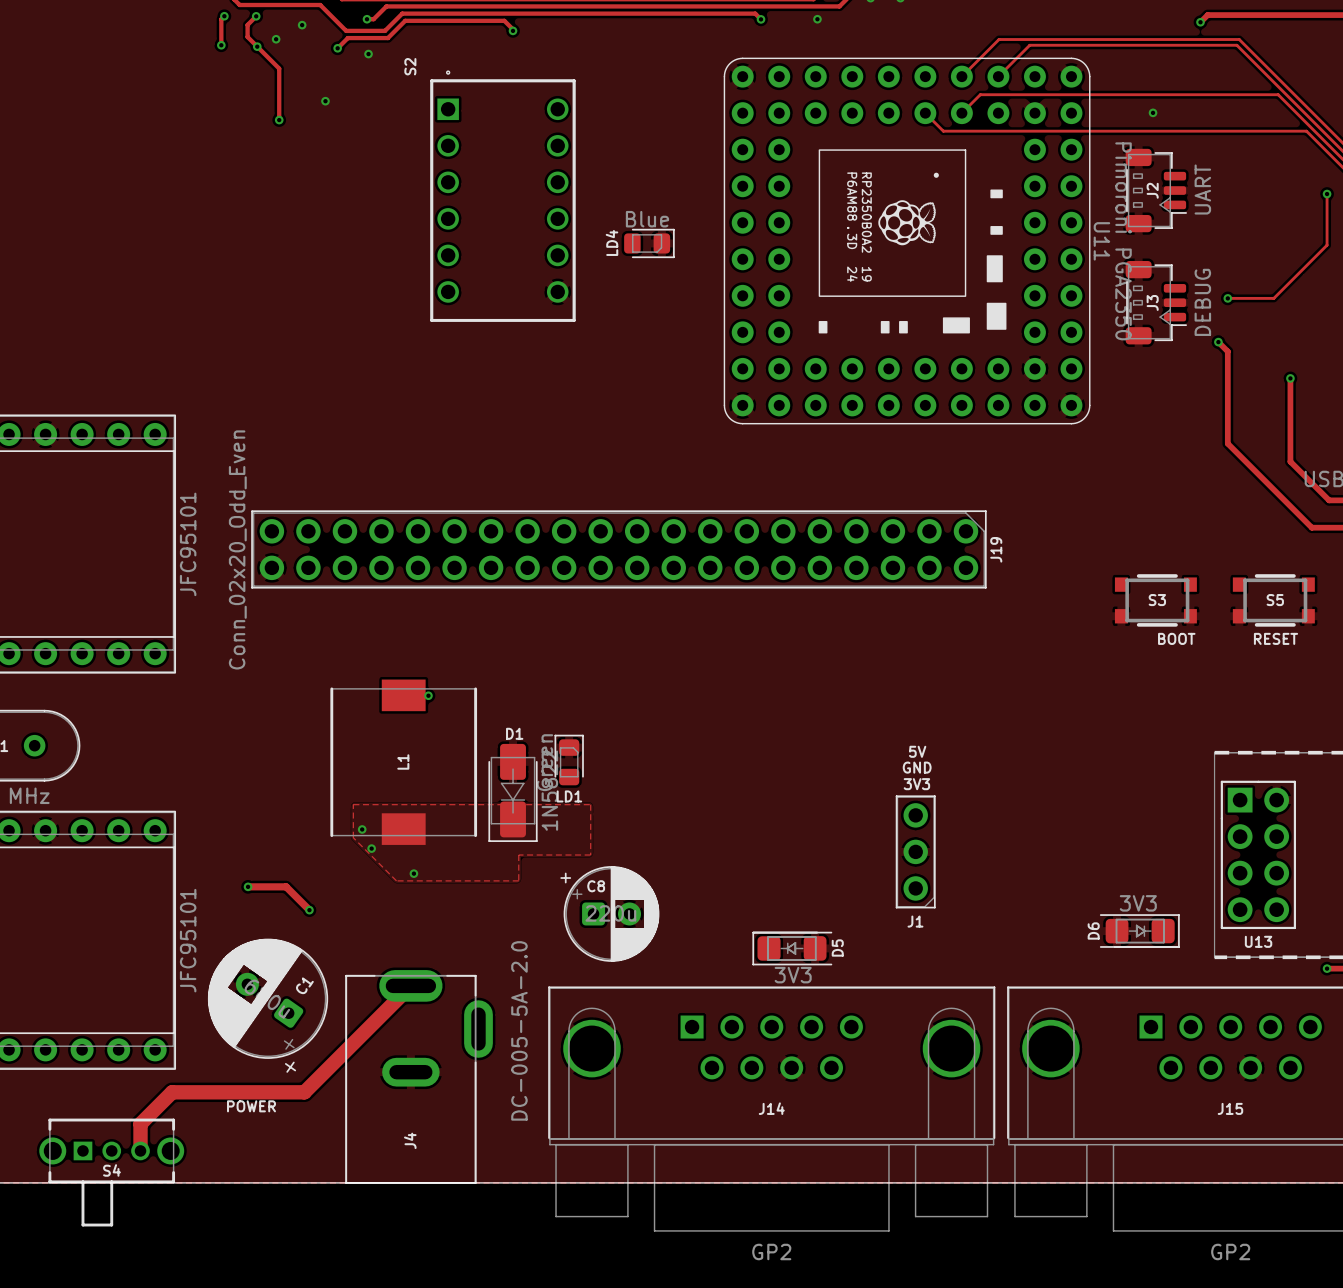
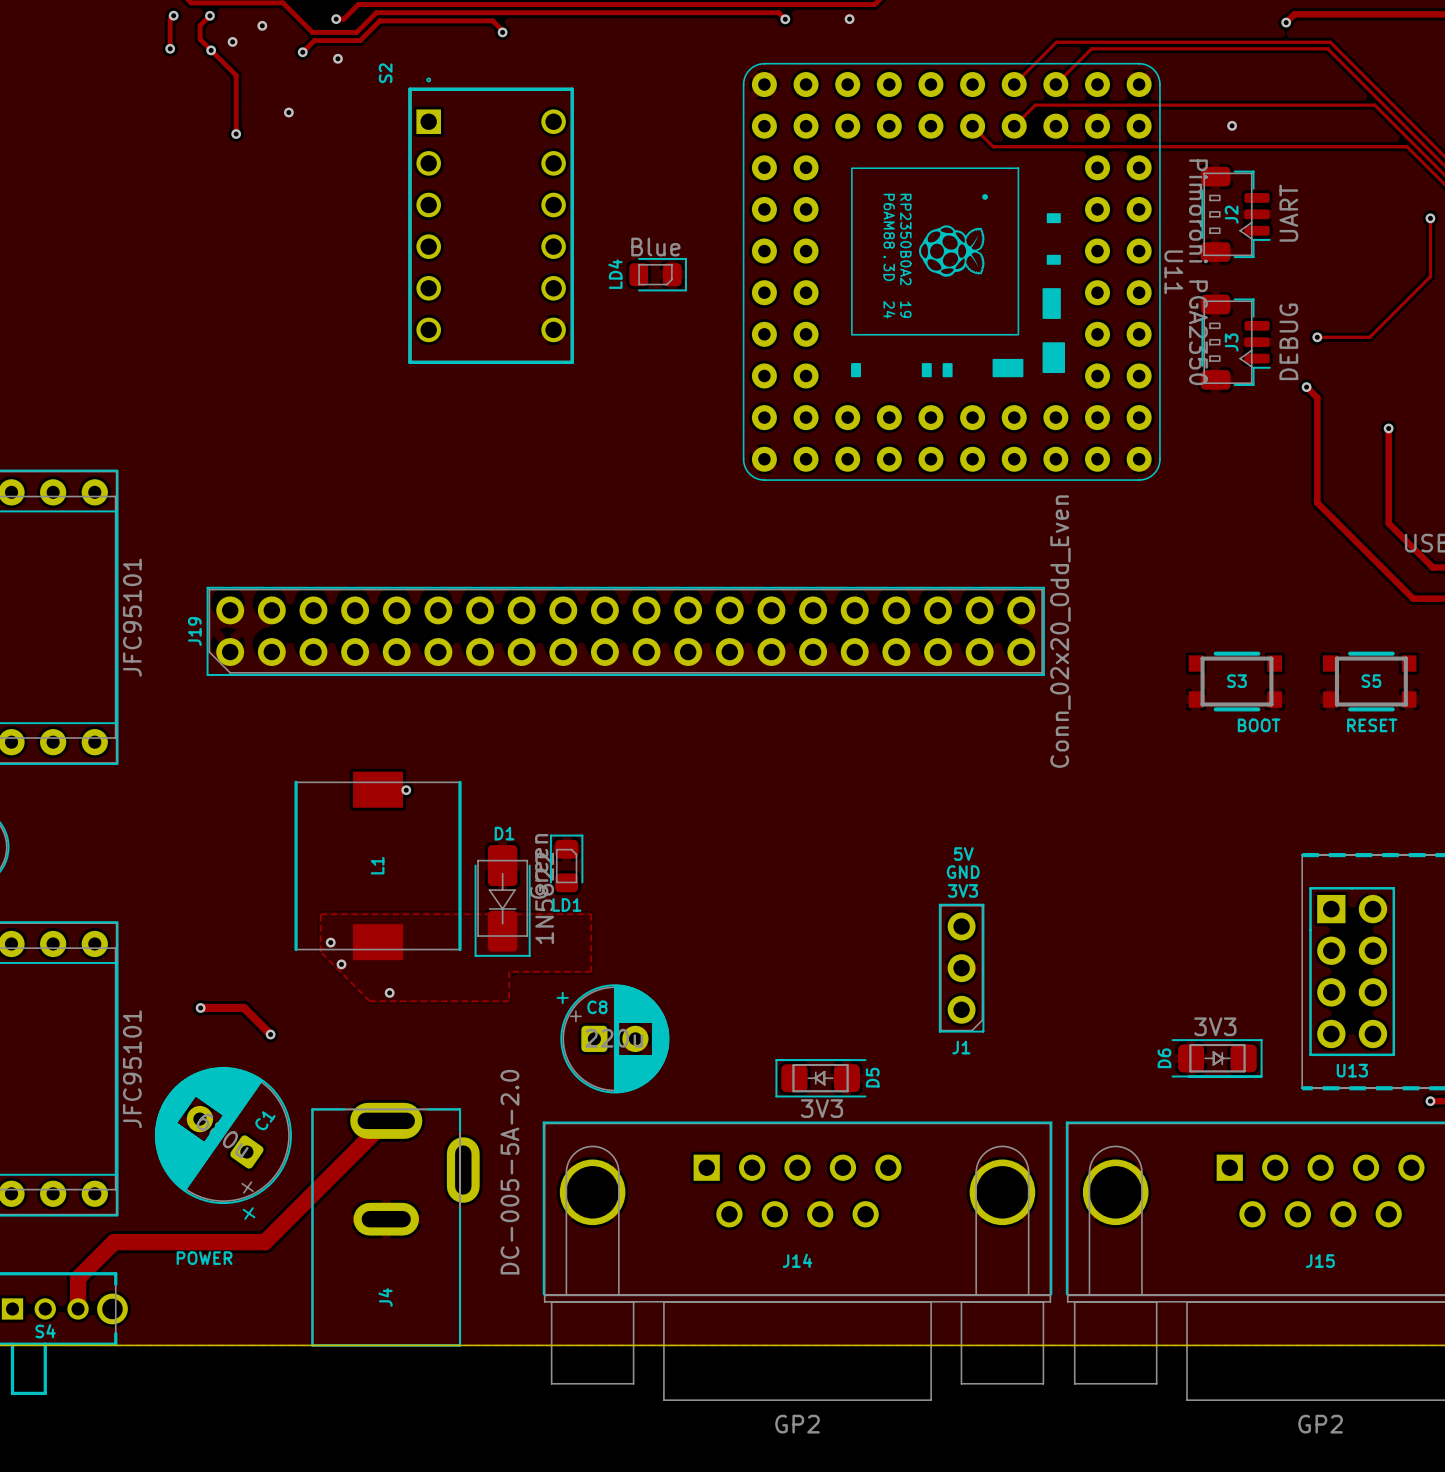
J19 rotation: 0° (618, 549) -> 180° (625, 631)

